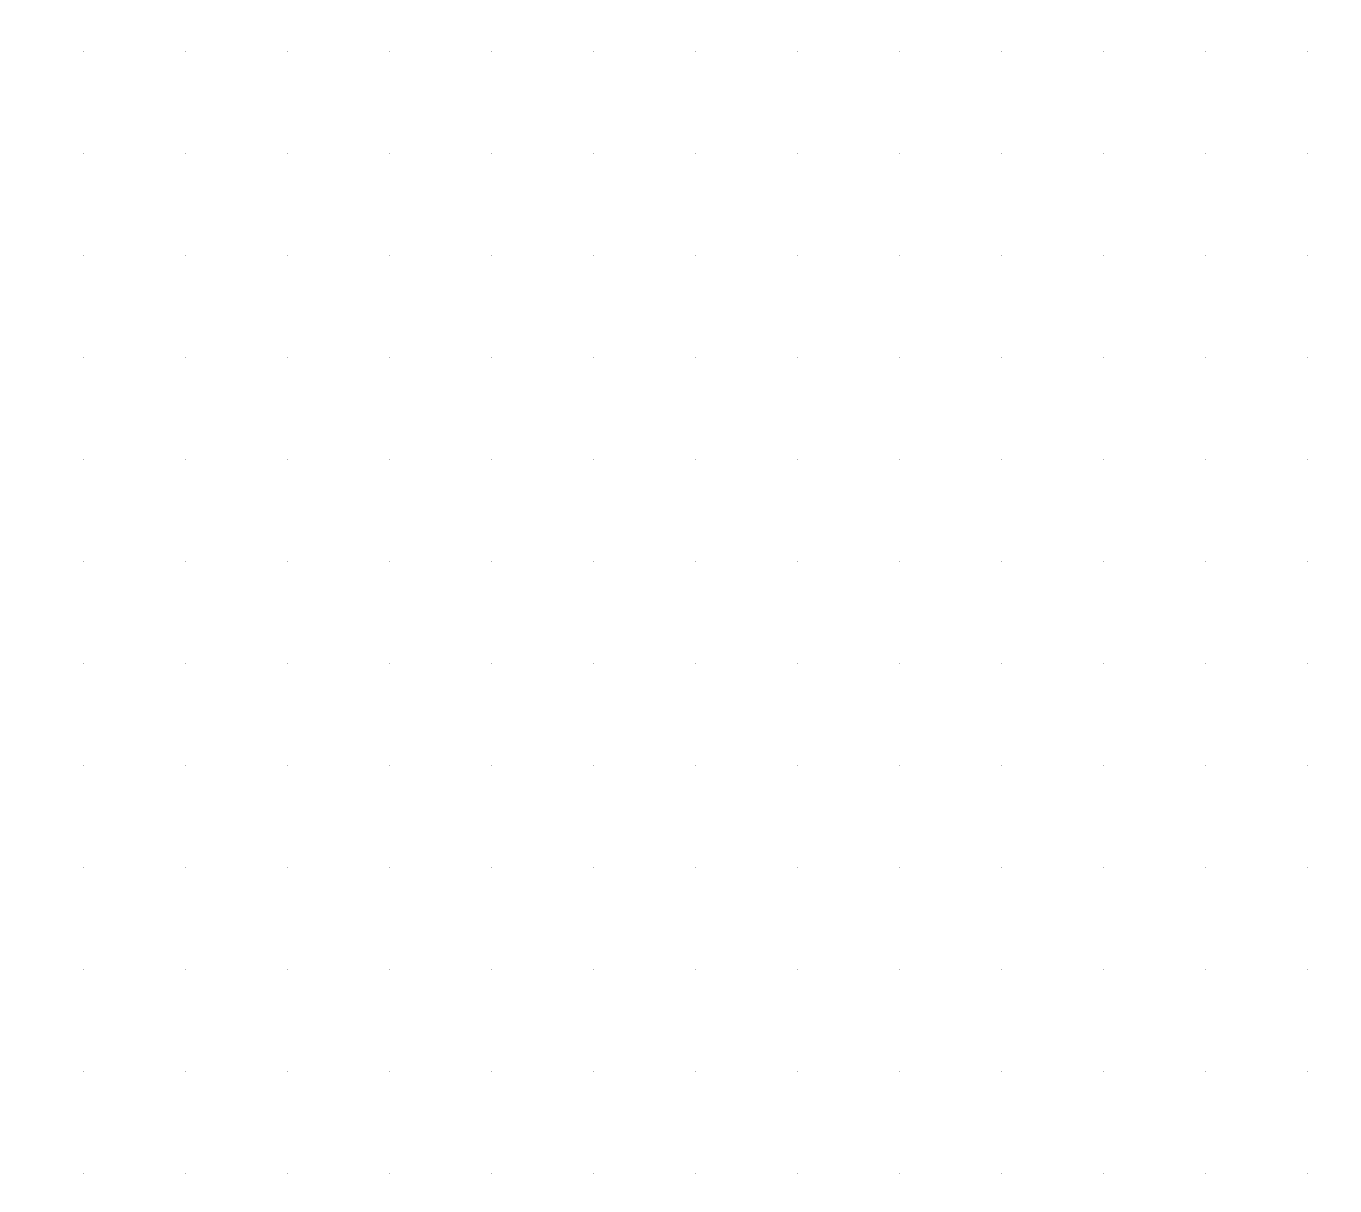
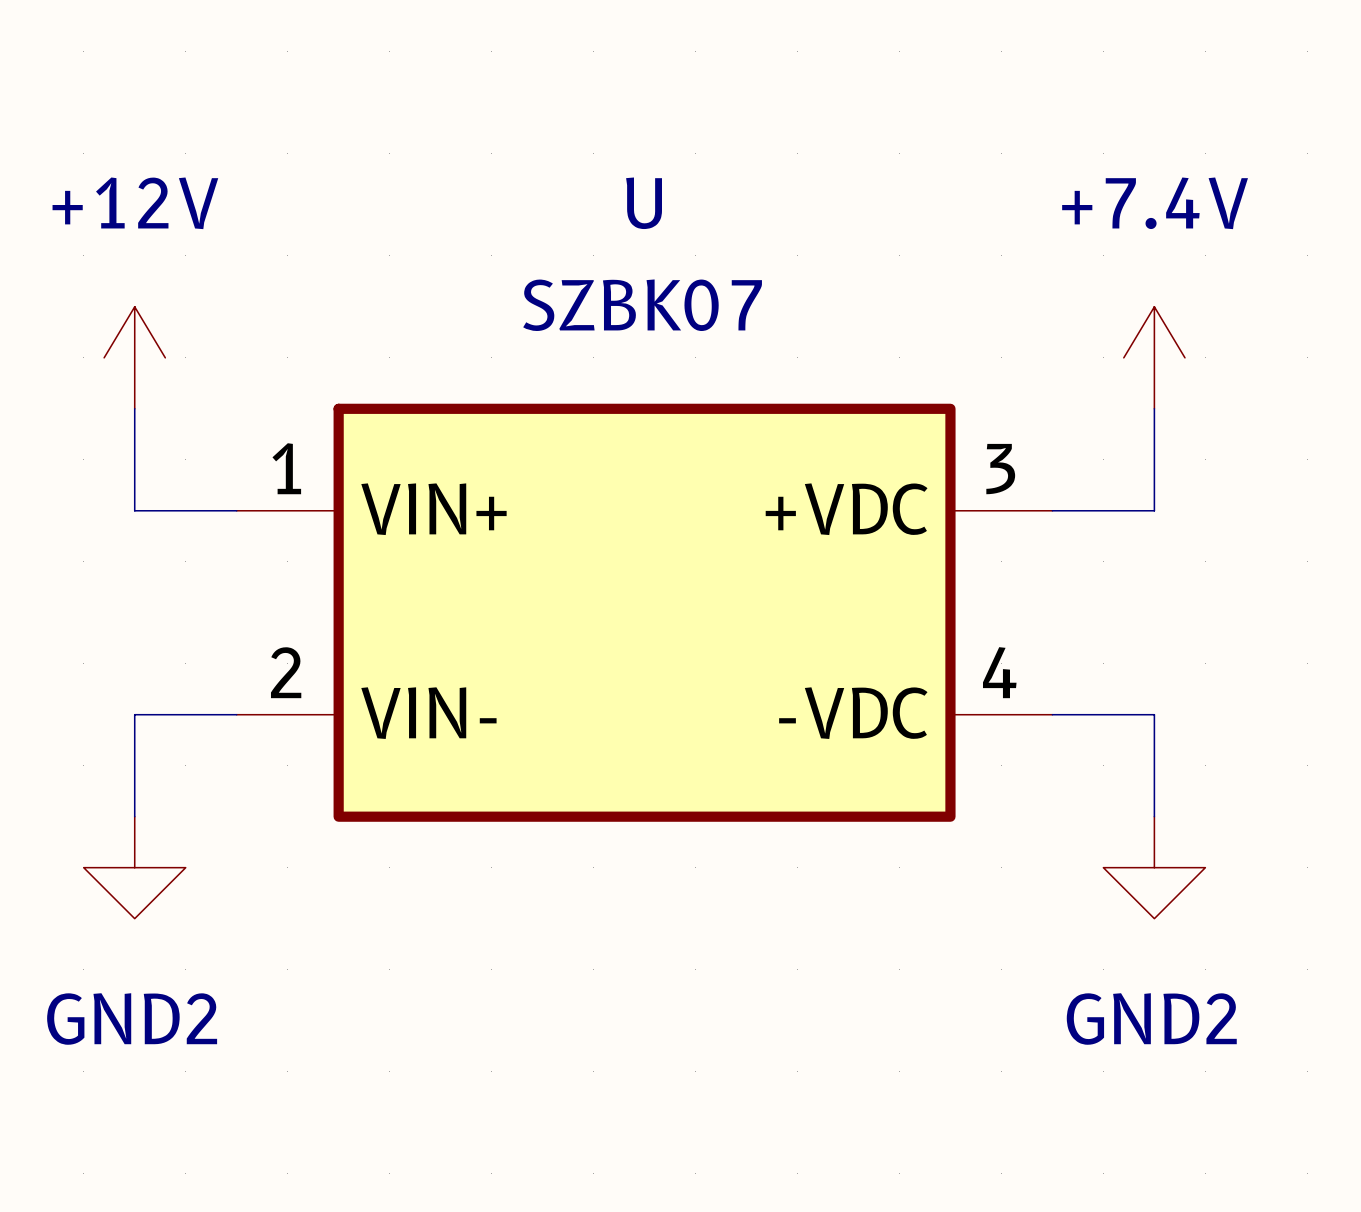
power symbol: none -> +12V (134, 357)
power symbol: none -> +7.4V (1154, 357)
wire: none -> (134, 408) (134, 510) (236, 510)
wire: none -> (1154, 408) (1154, 510) (1052, 510)
U: none -> SZBK07 (644, 612)
wire: none -> (236, 714) (134, 714) (134, 816)
wire: none -> (1052, 714) (1154, 714) (1154, 816)
power symbol: none -> GND2 (134, 867)
power symbol: none -> GND2 (1154, 867)

